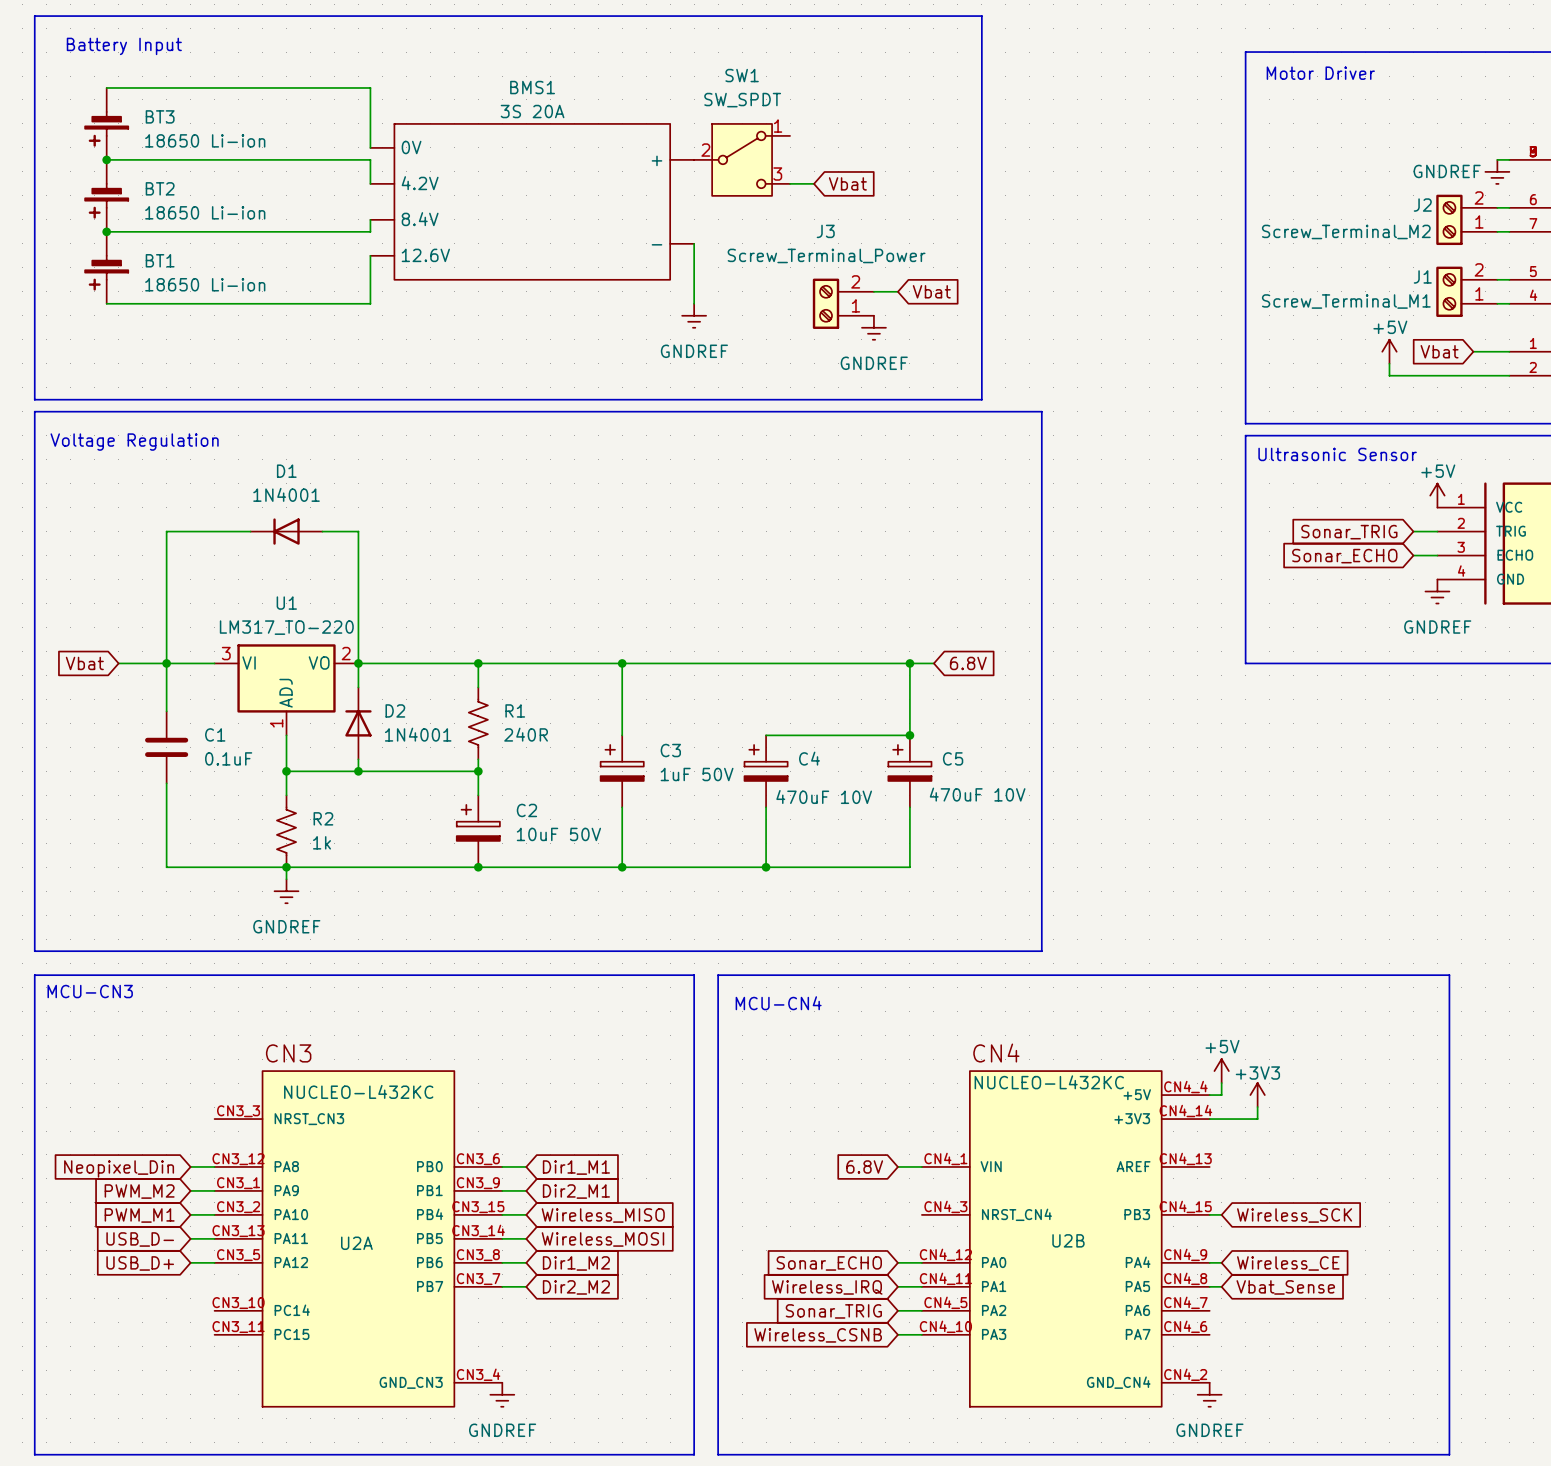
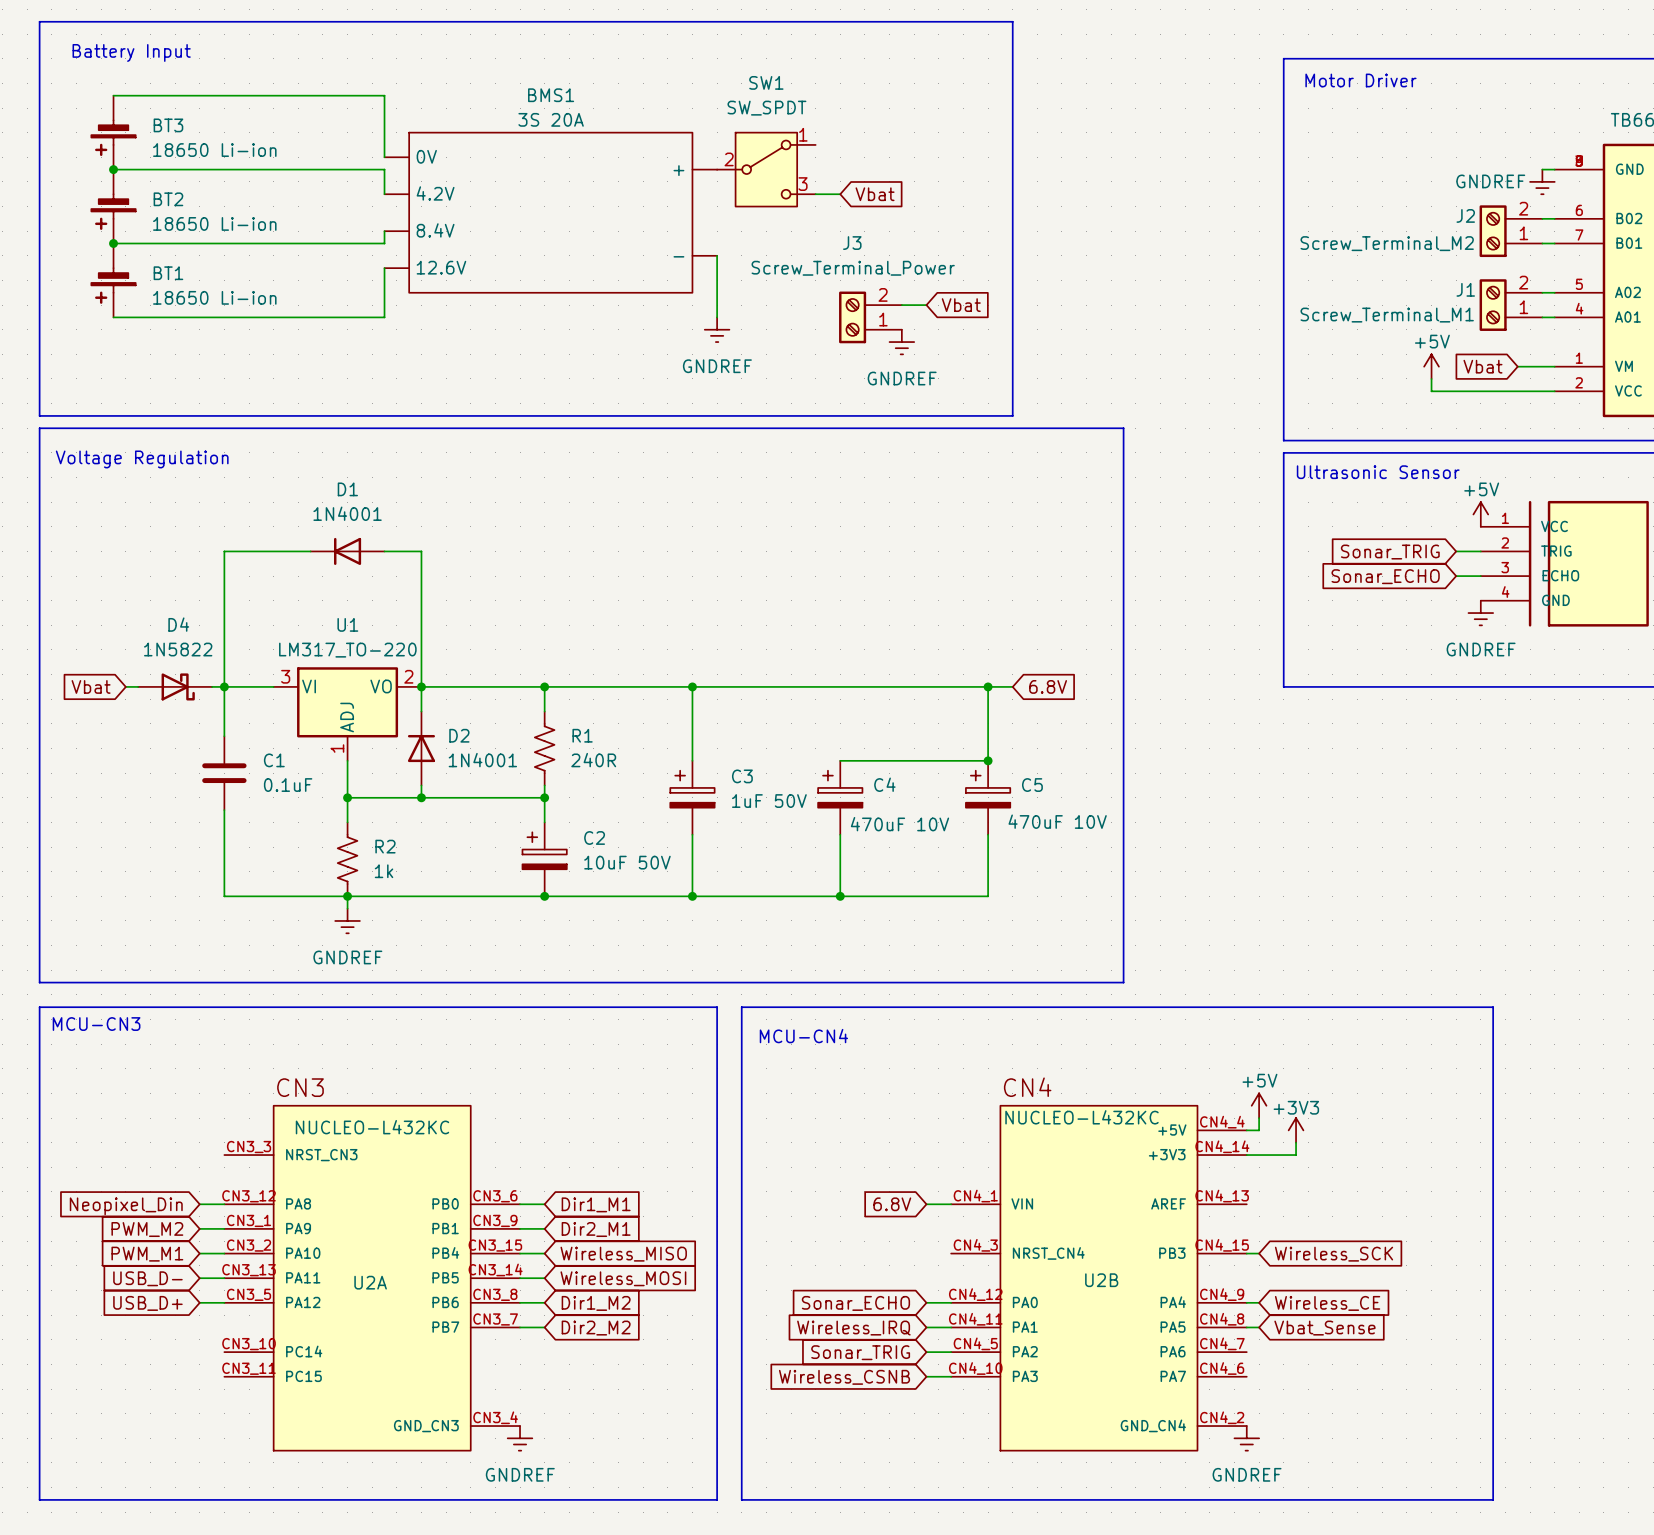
line: (1041, 411) (1041, 951) -> (1074, 428) (1123, 428) (1123, 982) (1074, 982)
wire: (214, 531) (166, 531) (166, 711) -> (224, 551) (224, 736)
D1 position: (286, 531) -> (347, 551)
wire: (322, 531) (358, 531) (358, 687) -> (384, 551) (421, 551) (421, 711)
junction position: (166, 663) -> (224, 686)
D4: none -> 1N5822 (175, 686)
junction: (358, 663) -> none
junction: none -> (421, 686)
wire: (478, 663) (478, 687) -> (544, 686) (544, 711)
junction: (478, 663) -> none
junction: none -> (544, 686)
wire: (622, 663) (622, 735) -> (692, 686) (692, 760)
junction: (622, 663) -> none
junction: none -> (692, 686)
wire: (909, 663) (909, 735) -> (988, 686) (988, 760) (938, 760)
junction: (909, 663) -> none
junction: none -> (988, 686)
global label position: 6.8V (968, 663) -> 6.8V (1048, 686)
U1 position: (286, 689) -> (347, 714)
D2 position: (358, 723) -> (421, 748)
R1 position: (478, 723) -> (544, 748)
wire: (286, 735) (286, 795) -> (347, 760) (347, 822)
wire: (766, 735) (814, 735) -> (963, 686) (1012, 686)
junction: (909, 735) -> none
junction: none -> (988, 760)
C1 position: (166, 747) -> (224, 773)
wire: (358, 759) (358, 771) -> (421, 785) (421, 797)
wire: (478, 759) (478, 795) -> (544, 785) (544, 822)
wire: (286, 771) (334, 771) -> (495, 797) (544, 797)
junction: (286, 771) -> none
junction: none -> (347, 797)
junction: (358, 771) -> none
junction: none -> (421, 797)
junction: (478, 771) -> none
junction: none -> (544, 797)
C3 position: (622, 771) -> (692, 797)
C4 position: (766, 771) -> (840, 797)
C5 position: (909, 771) -> (988, 797)
wire: (166, 783) (166, 867) (214, 867) -> (224, 810) (224, 896)
wire: (622, 807) (622, 867) -> (692, 834) (692, 896)
wire: (766, 807) (766, 867) -> (840, 834) (840, 896)
wire: (909, 807) (909, 867) -> (988, 834) (988, 896) (938, 896)
R2 position: (286, 831) -> (347, 859)
C2 position: (478, 831) -> (544, 859)
wire: (286, 867) (286, 879) -> (347, 896) (347, 908)
junction position: (286, 867) -> (347, 896)
junction: (478, 867) -> none
junction: none -> (544, 896)
junction: (622, 867) -> none
junction: none -> (692, 896)
junction: (766, 867) -> none
junction: none -> (840, 896)
power symbol position: GNDREF (286, 891) -> GNDREF (347, 920)

